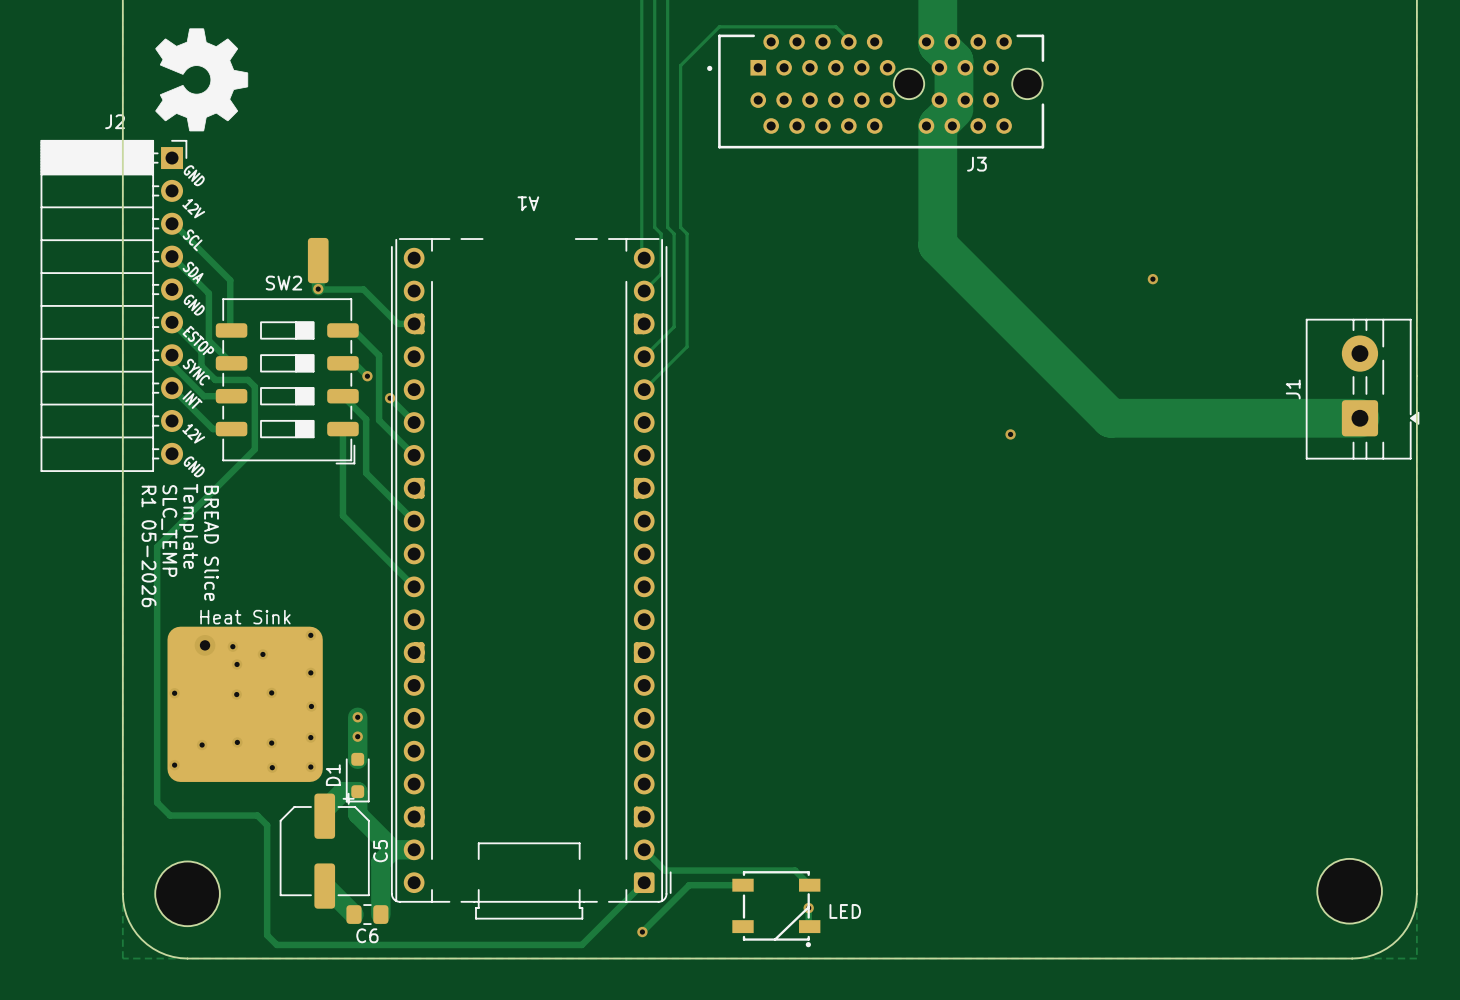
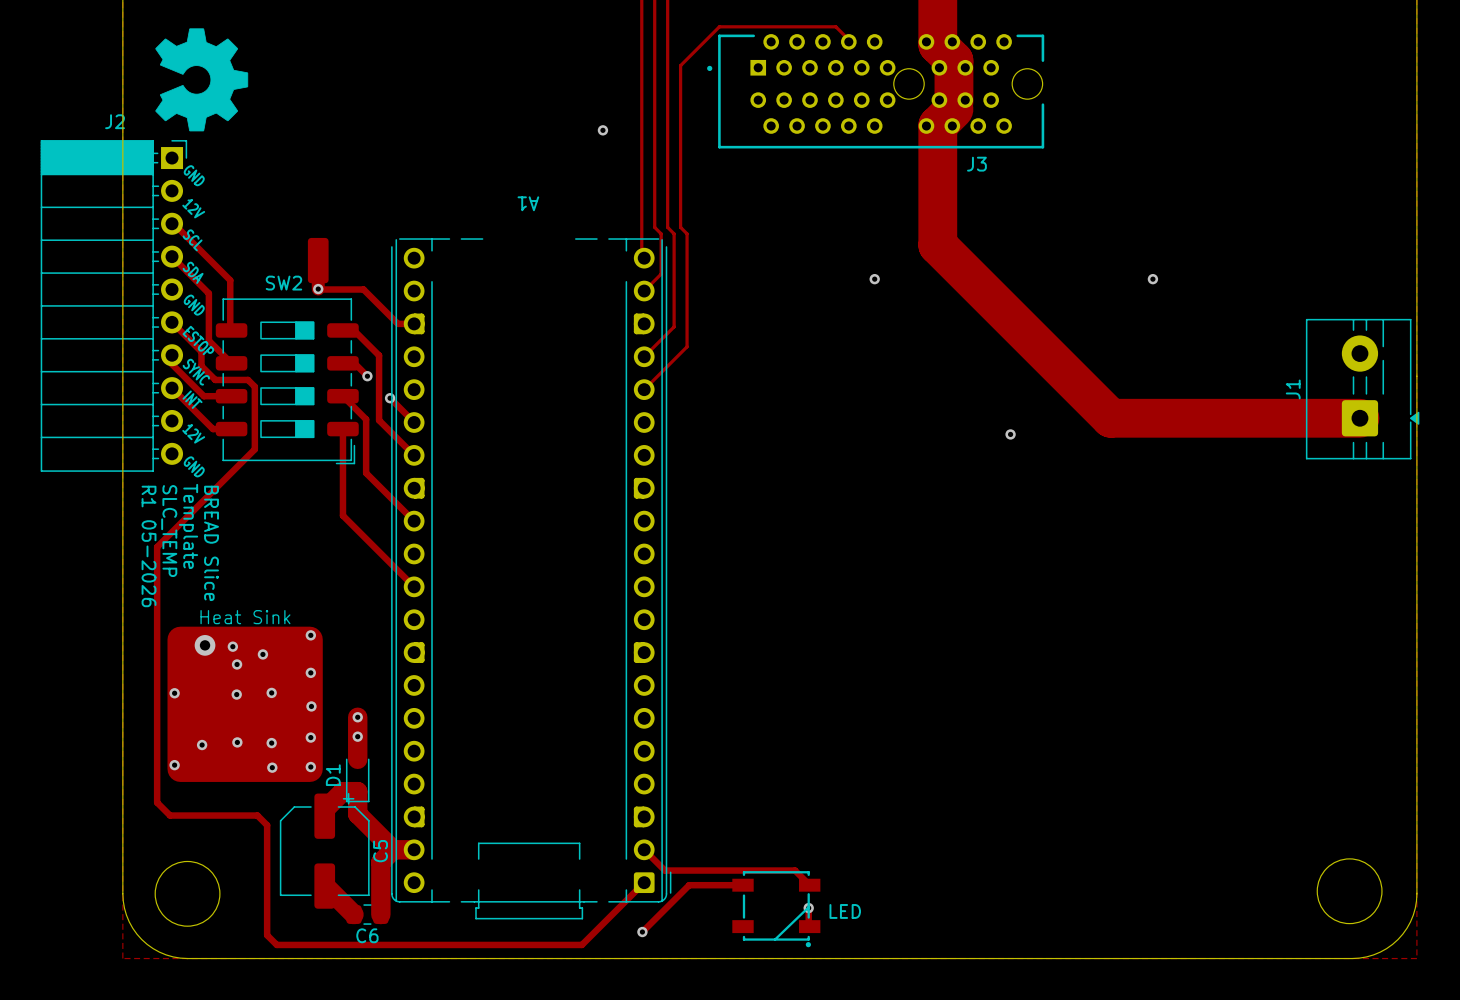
via: none -> (602, 130)
via: none -> (874, 279)

